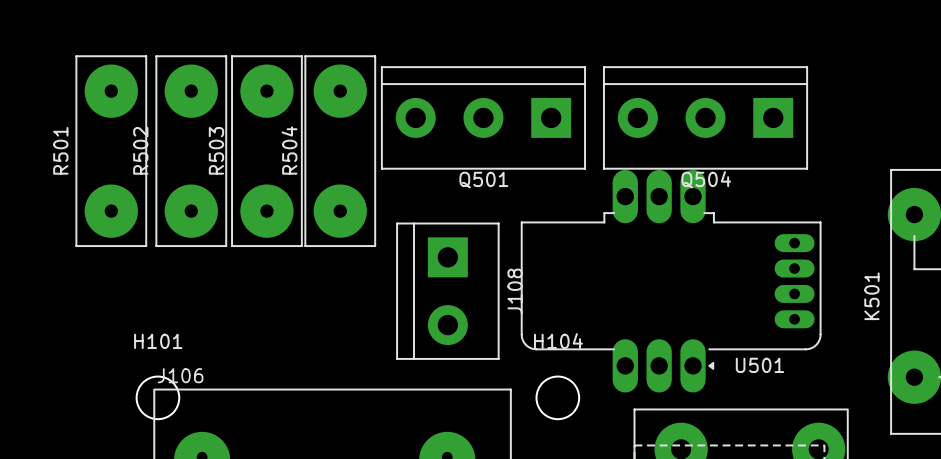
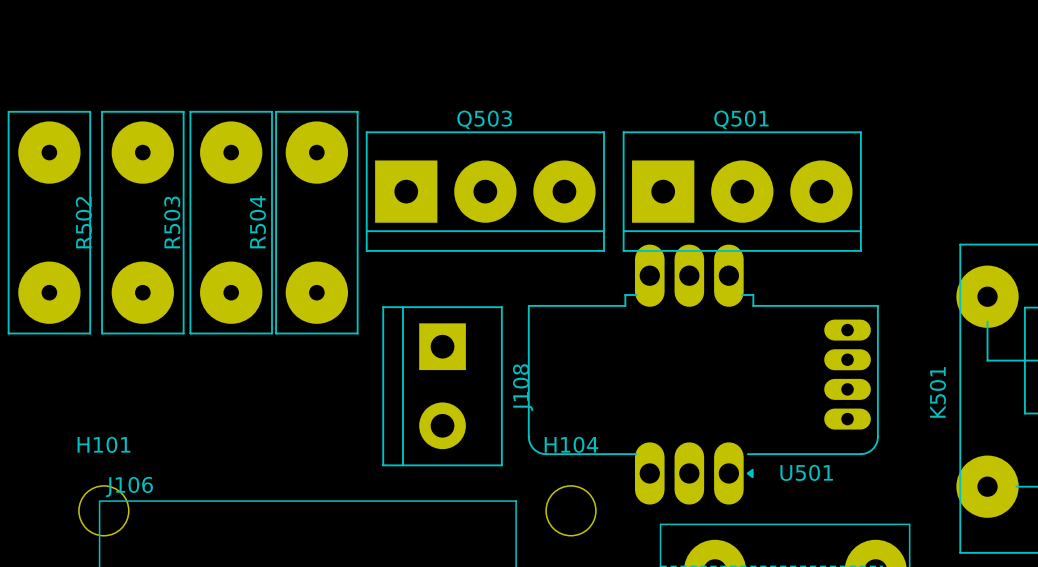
Q501 footprint: [381, 66, 586, 170] -> [622, 131, 862, 252]
Q504: (705, 117) -> none
Q503: none -> (485, 191)
Q501 name position: Q501 (483, 180) -> Q501 (741, 119)

